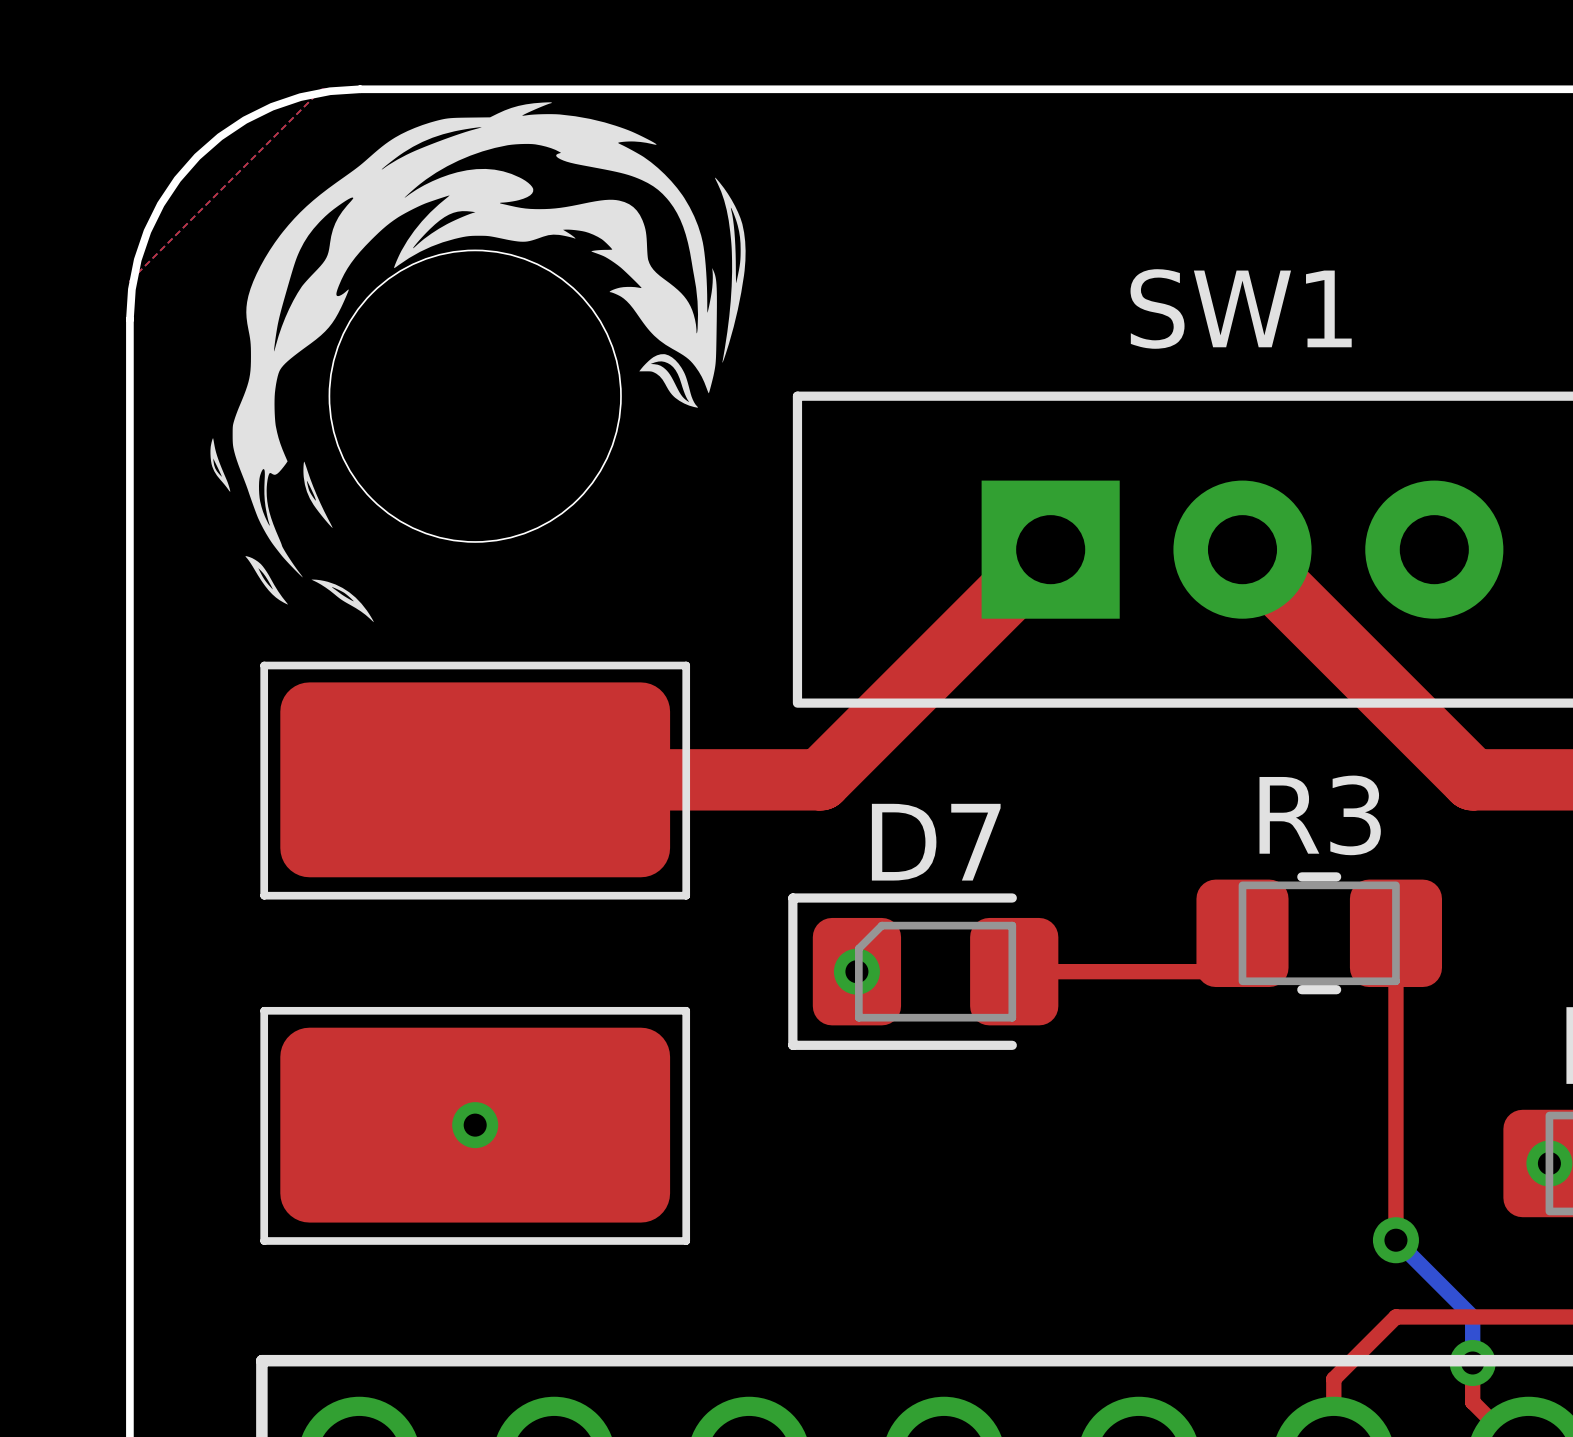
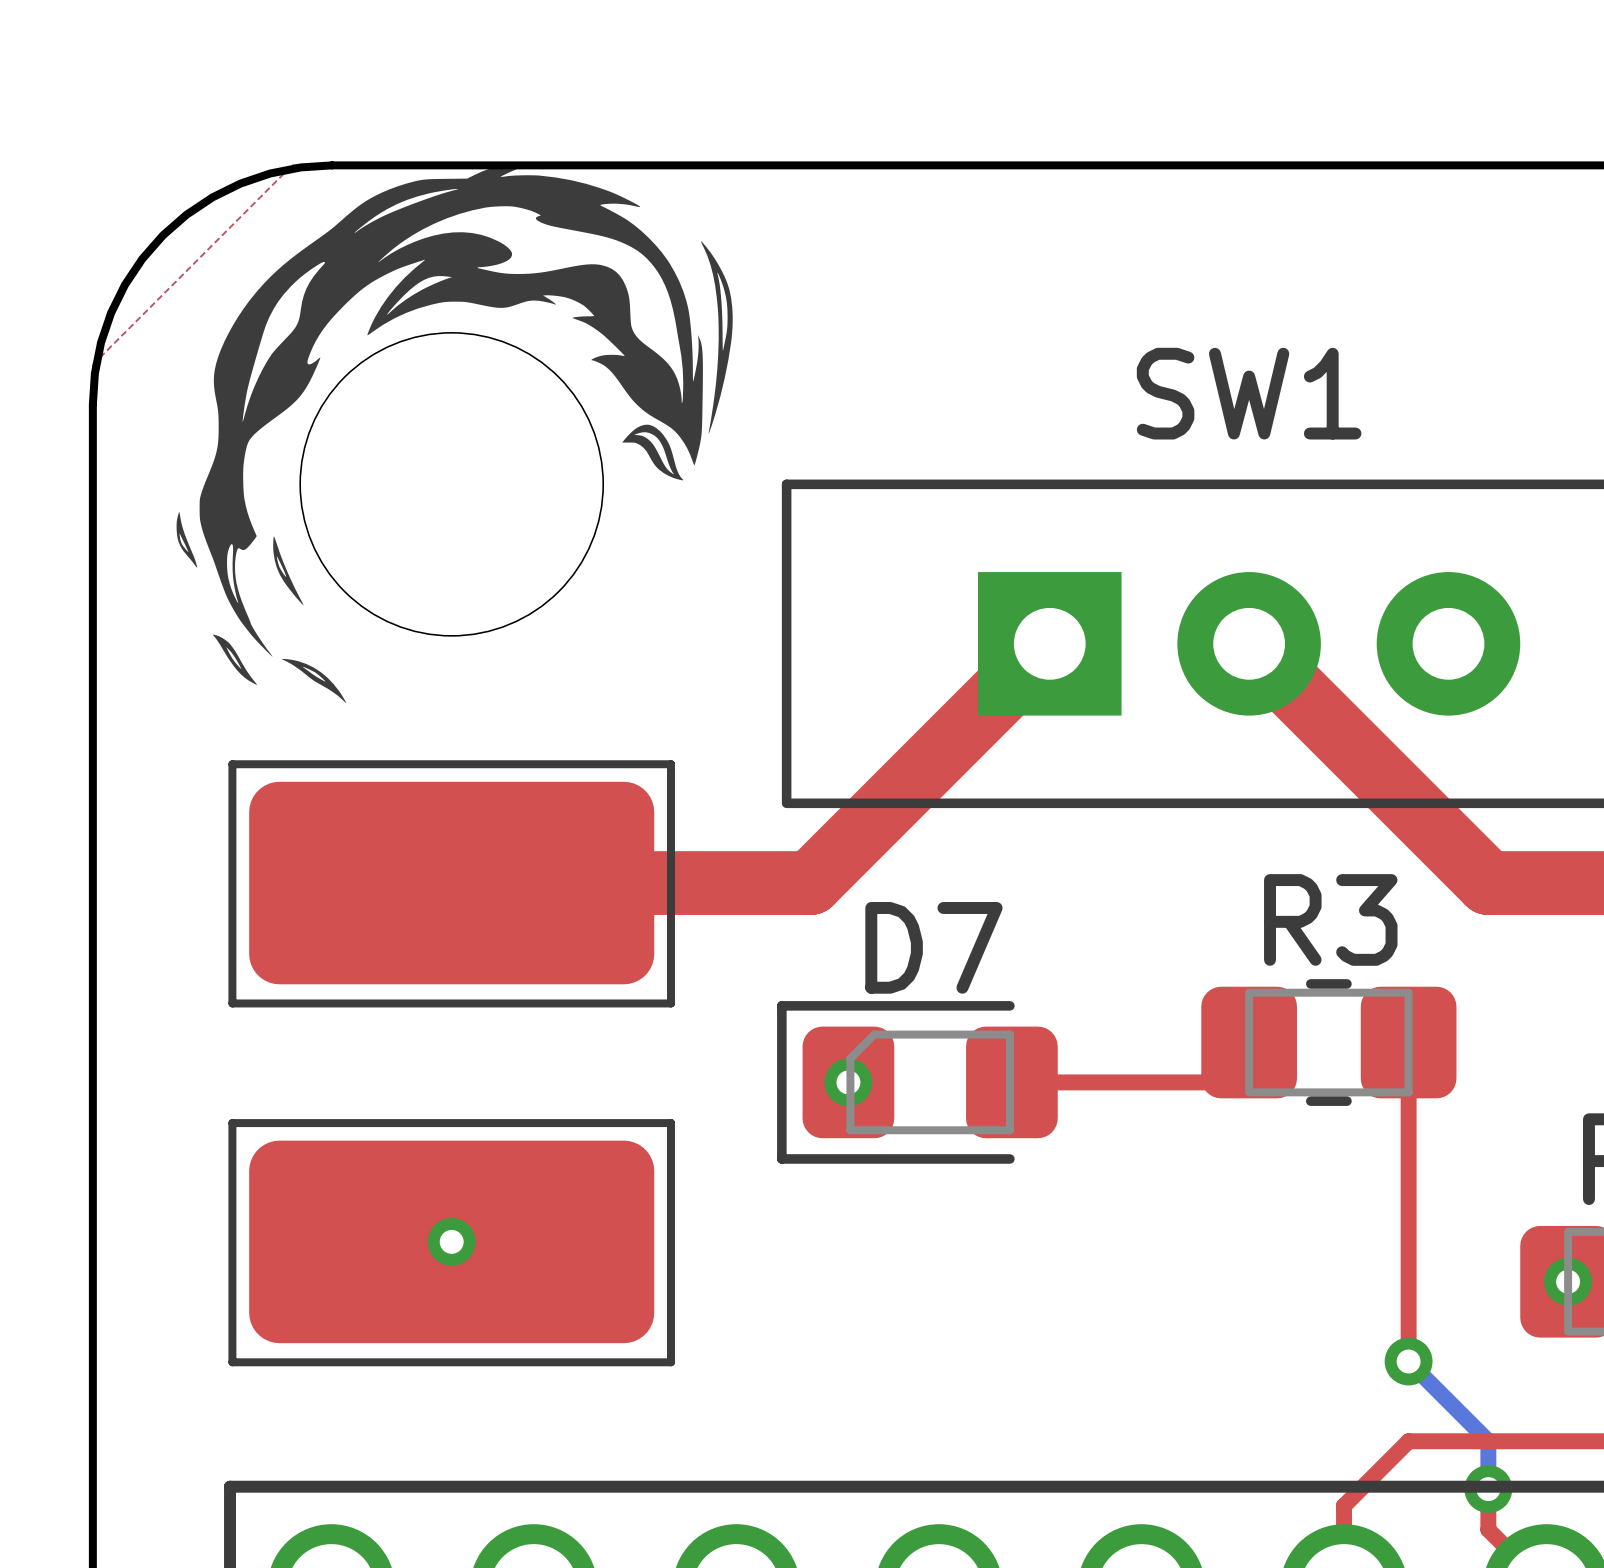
drawing position: (478, 362) -> (454, 433)

